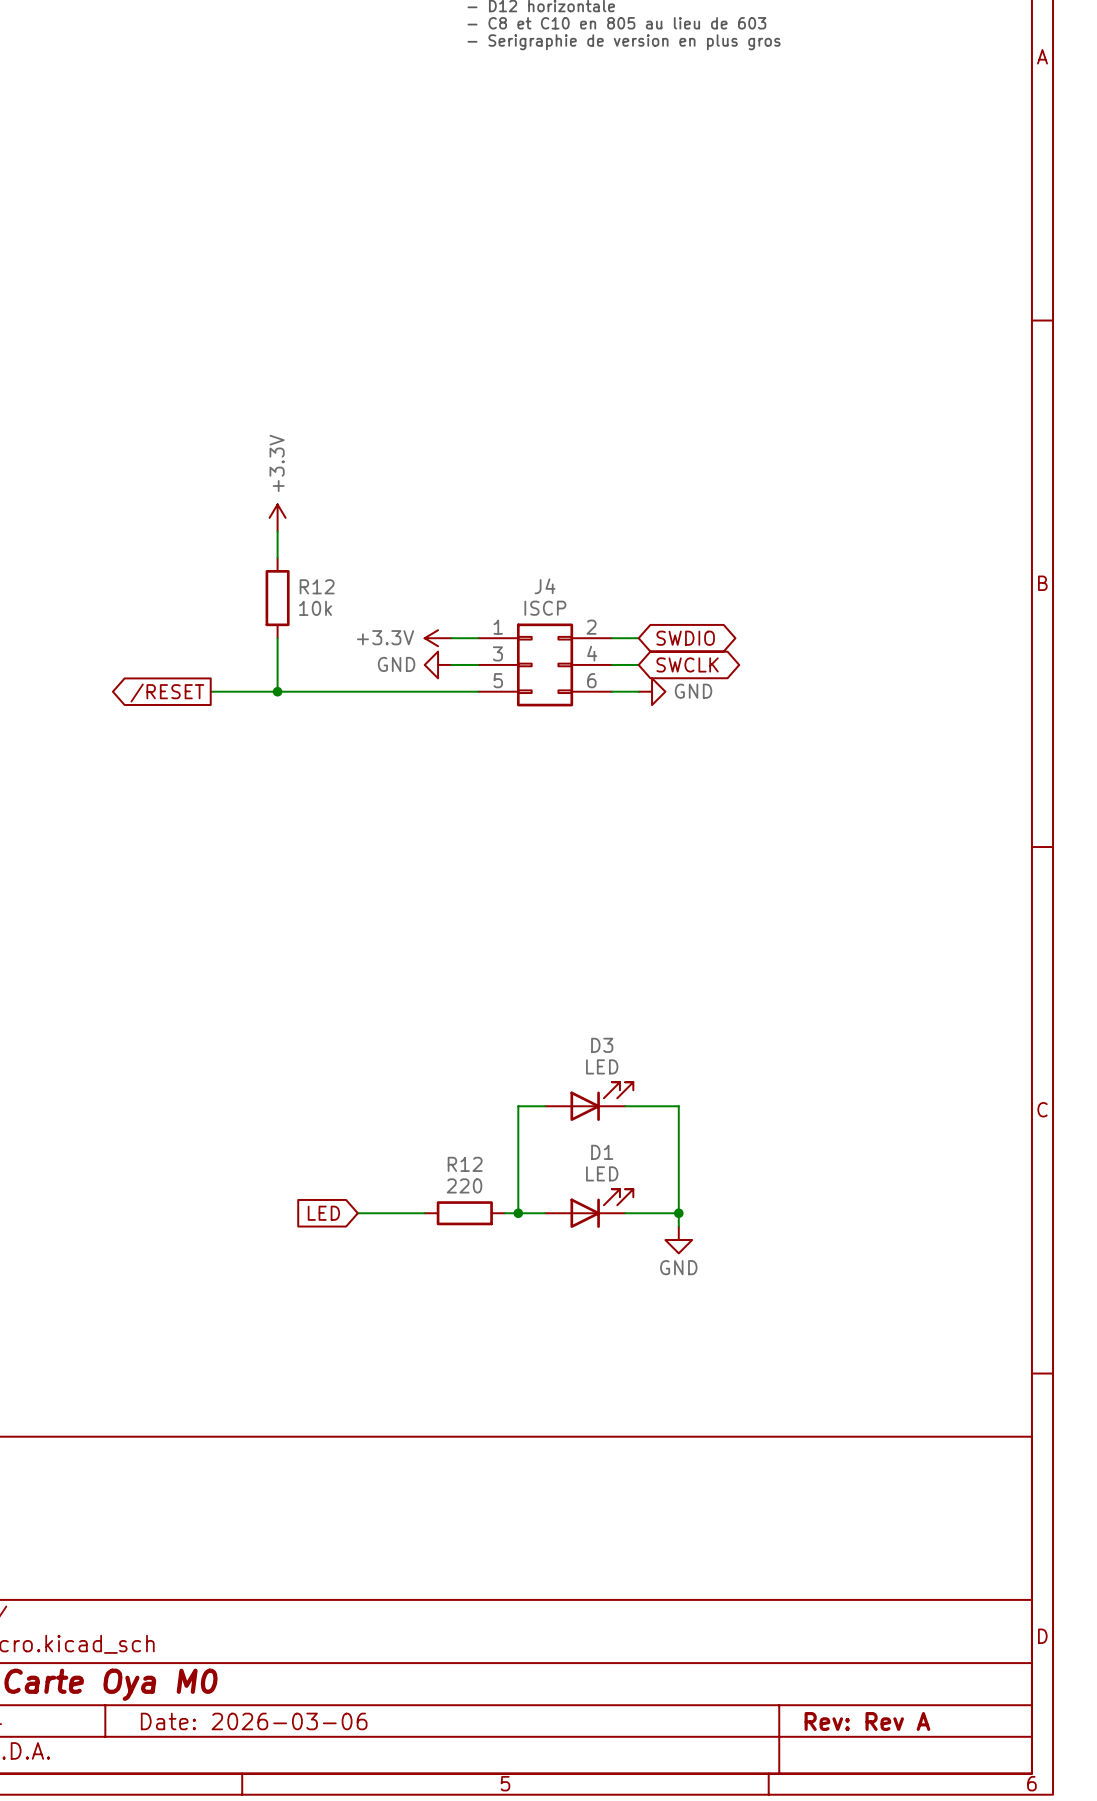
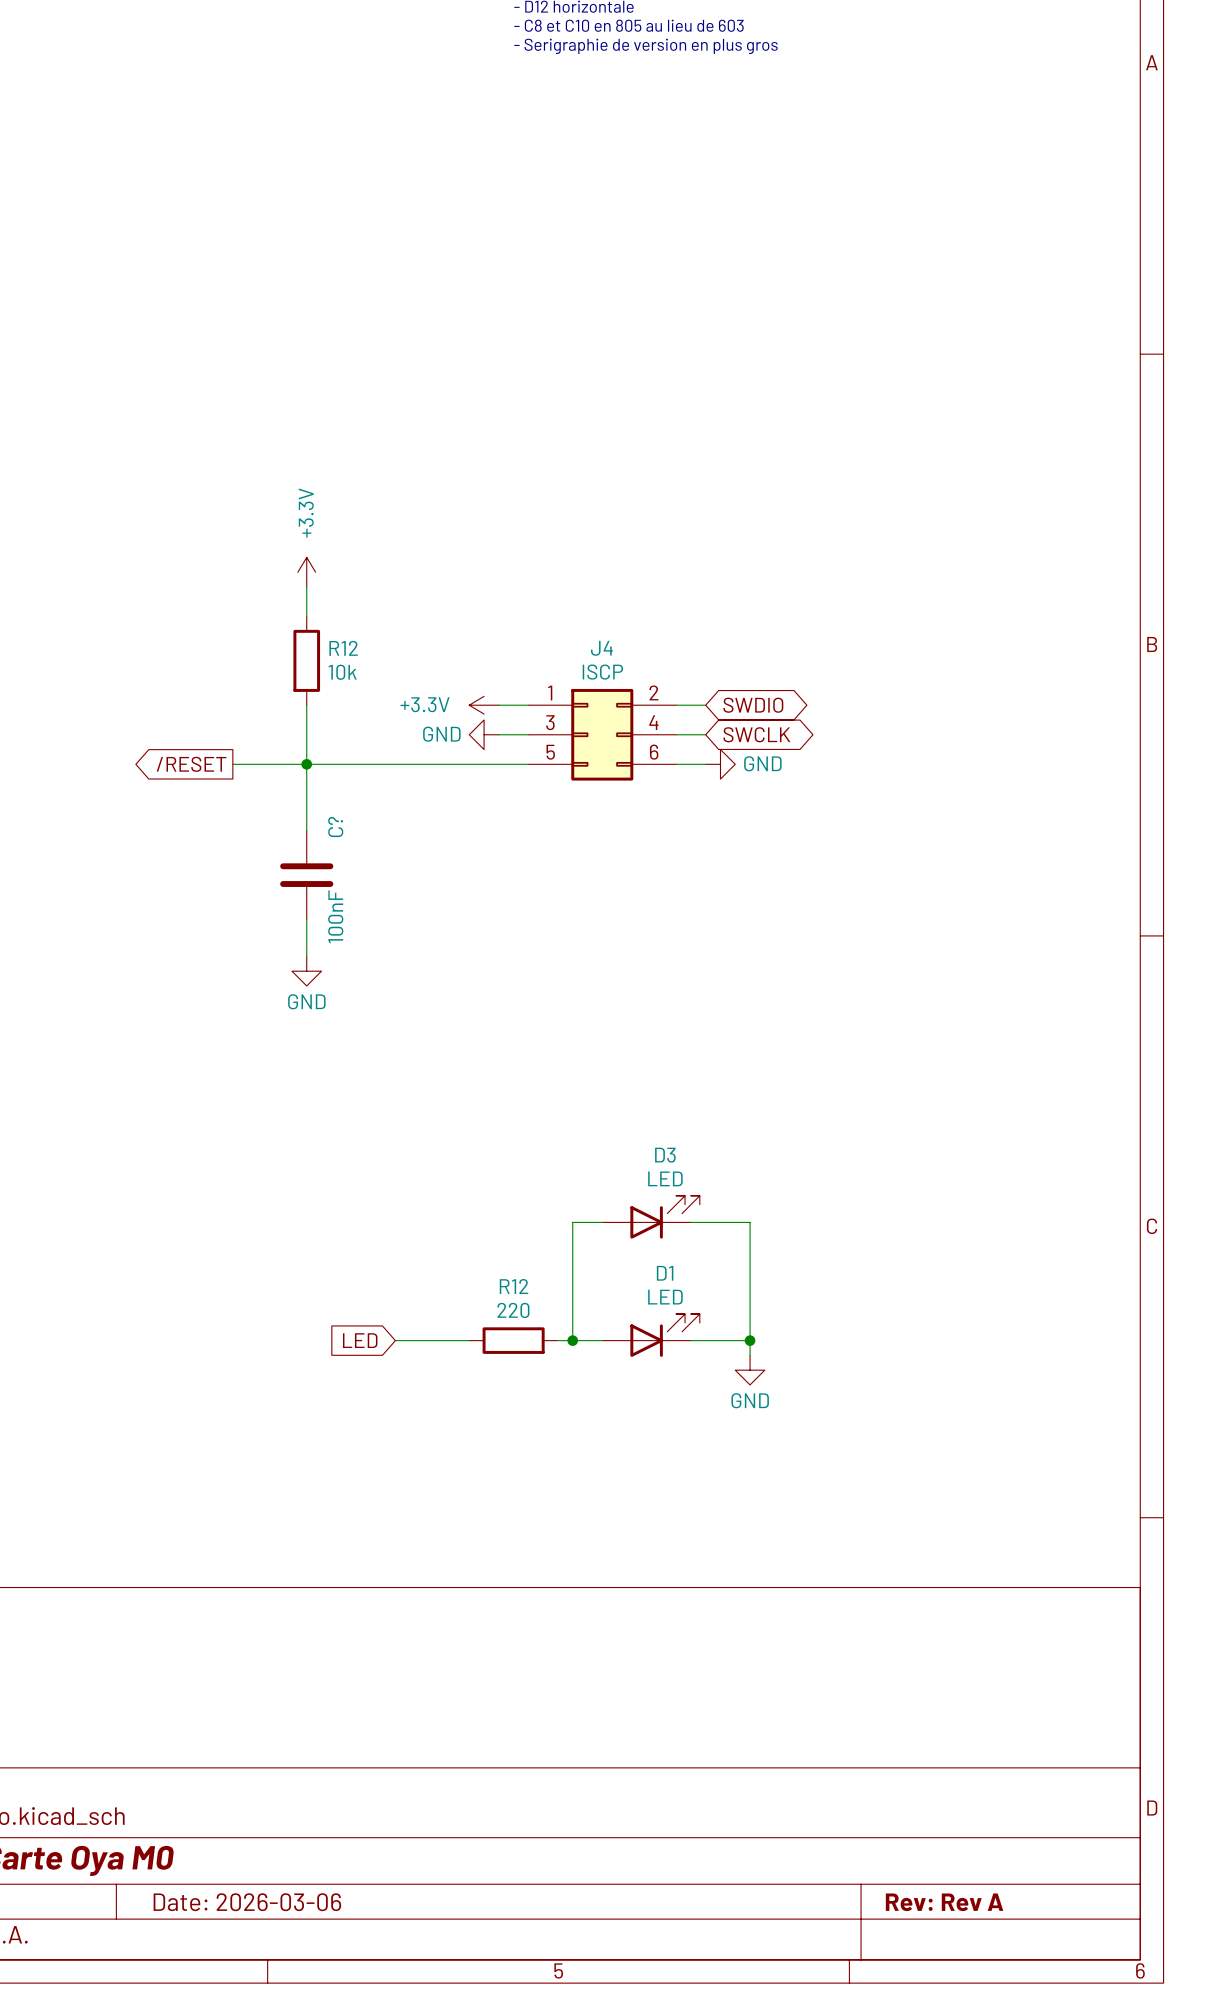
wire: none -> (306, 764) (306, 830)
C?: none -> 100nF (306, 875)
wire: none -> (306, 919) (306, 956)
power symbol: none -> GND (306, 971)

